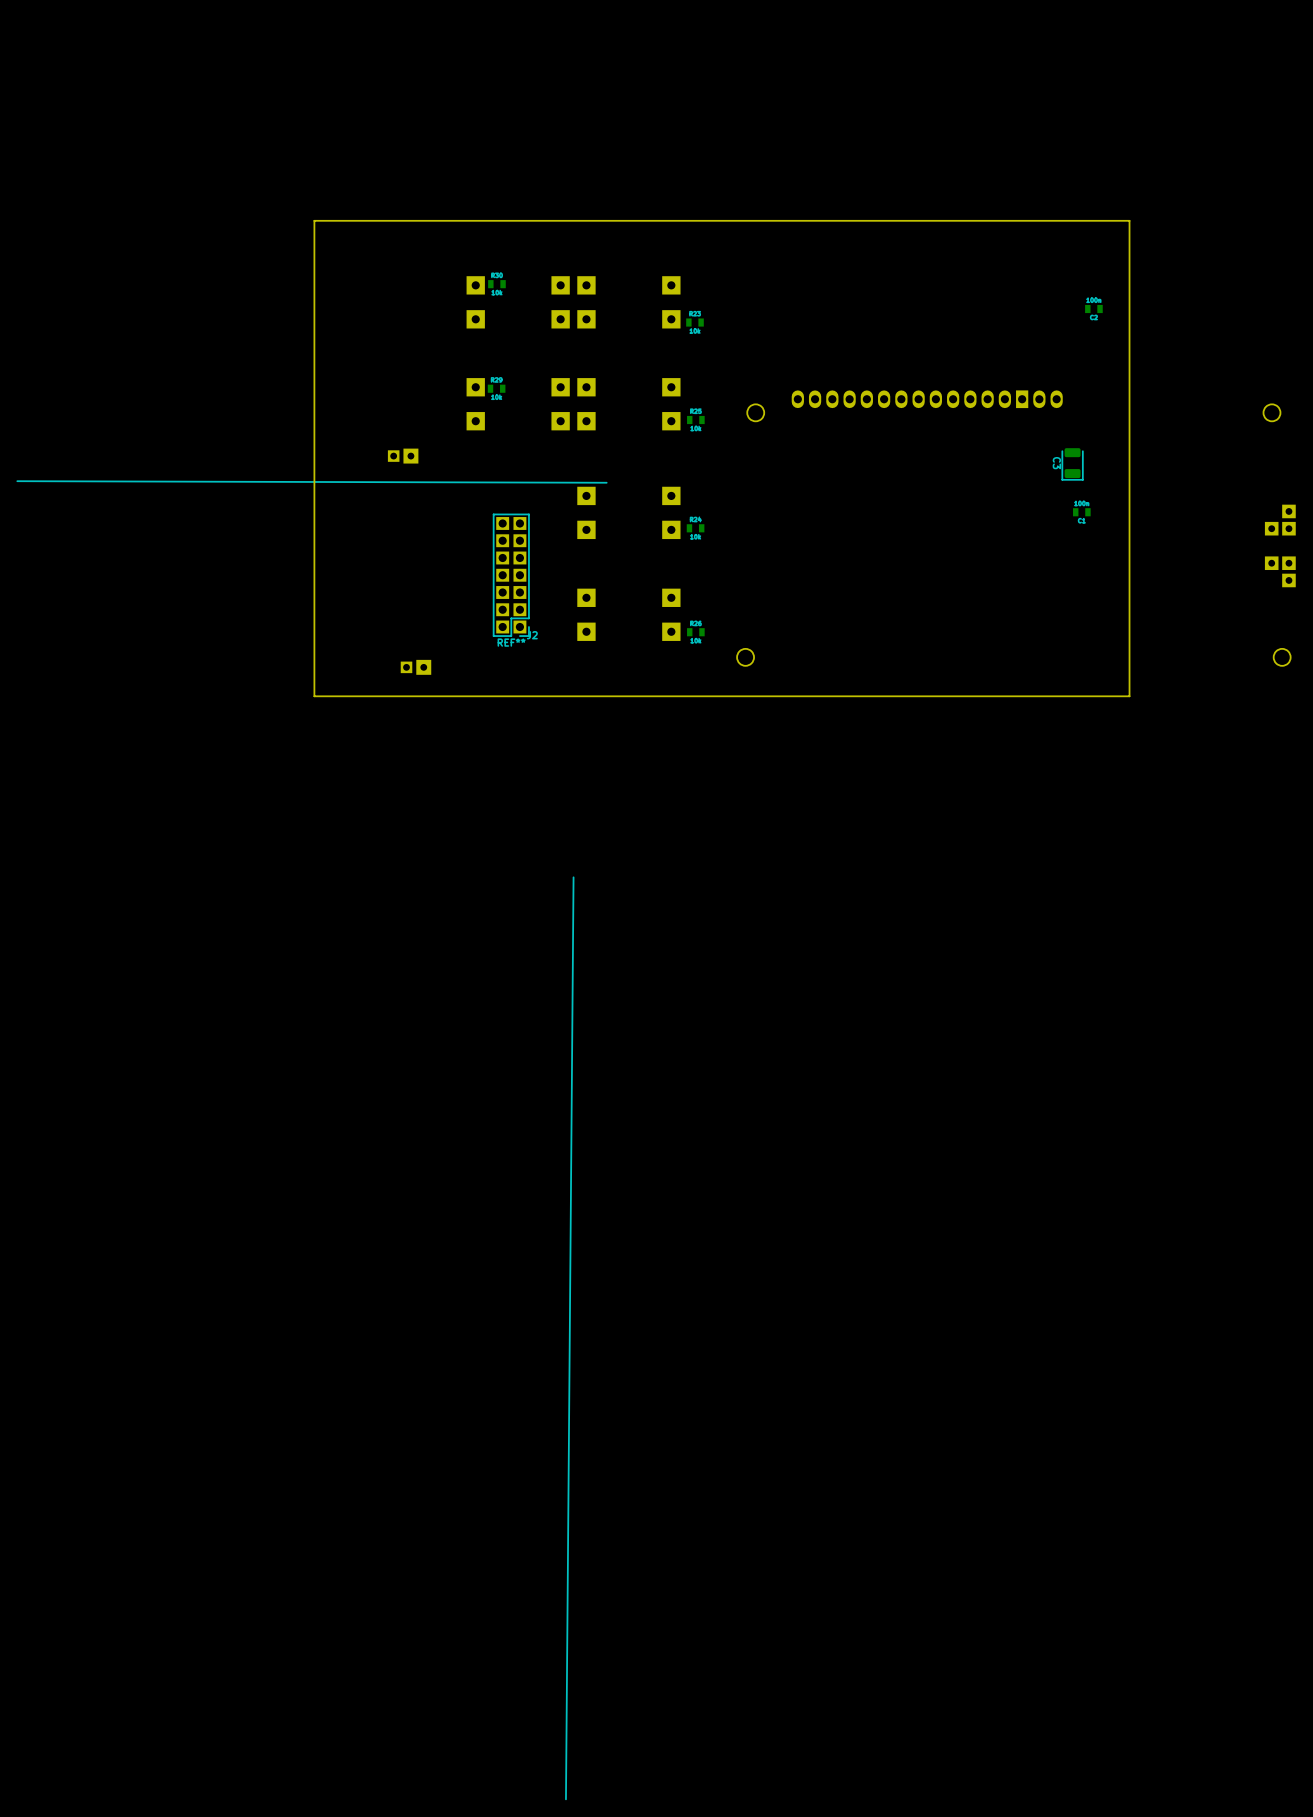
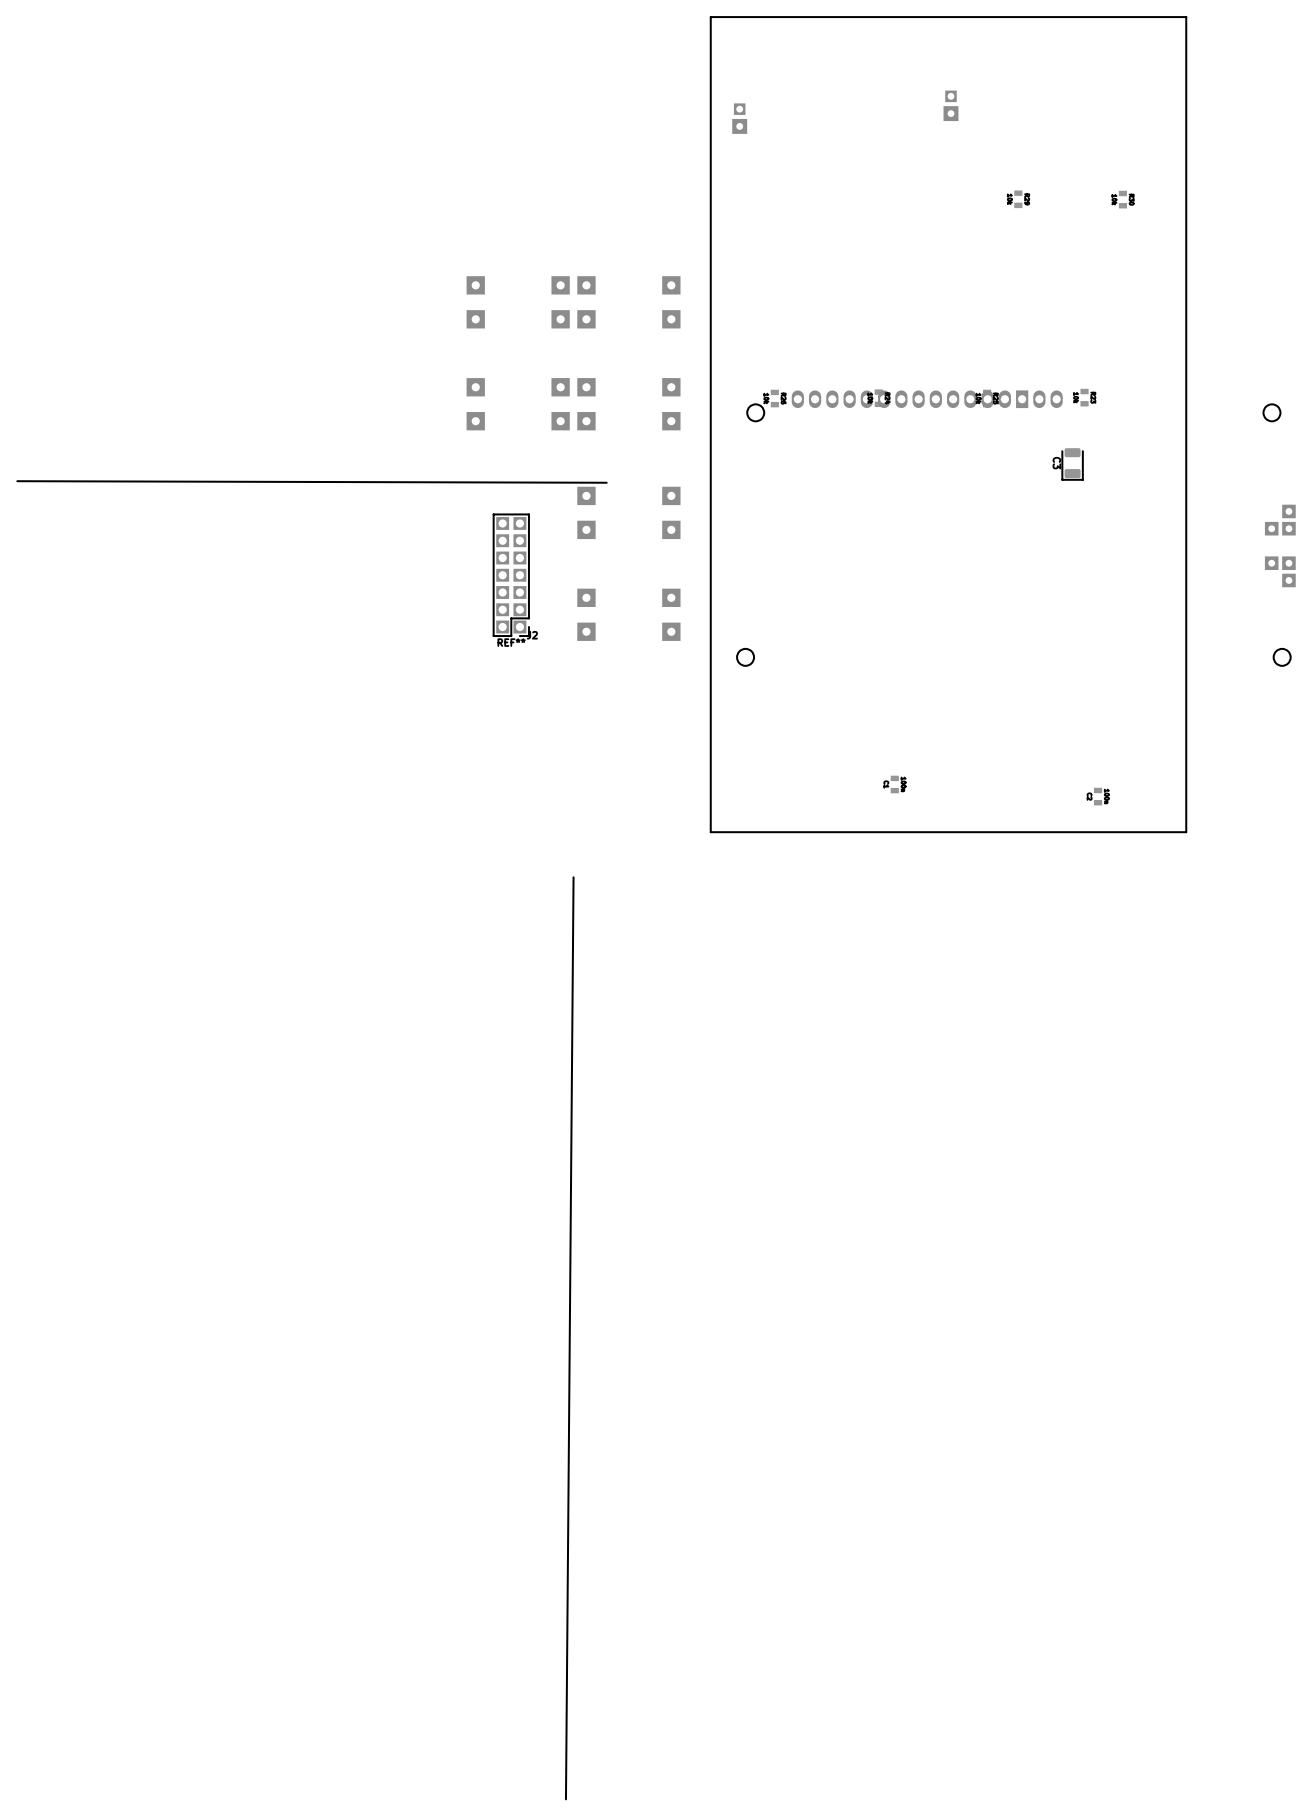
board edge: none -> (1186, 17) (710, 17) (710, 832) (1186, 832) (1186, 17)
part: none -> (950, 105)
part: none -> (739, 118)
board edge: (1129, 220) (1129, 696) (314, 696) (314, 220) (1129, 220) -> none
part rotation: 0° (496, 284) -> 90° clockwise (1122, 199)
part position: (496, 284) -> (1122, 199)
part rotation: 0° (1093, 309) -> 90° clockwise (1098, 796)
part position: (1093, 309) -> (1098, 796)
part rotation: 0° (694, 322) -> 90° clockwise (1084, 397)
part position: (694, 322) -> (1084, 397)
part rotation: 0° (496, 388) -> 90° clockwise (1018, 199)
part position: (496, 388) -> (1018, 199)
part rotation: 0° (695, 420) -> 90° clockwise (987, 398)
part position: (695, 420) -> (987, 398)
part: (403, 456) -> none
part rotation: 0° (1081, 512) -> 90° clockwise (894, 784)
part position: (1081, 512) -> (894, 784)
part rotation: 0° (695, 528) -> 90° clockwise (878, 398)
part position: (695, 528) -> (878, 398)
part rotation: 0° (695, 632) -> 90° clockwise (774, 398)
part position: (695, 632) -> (774, 398)
part: (415, 667) -> none

